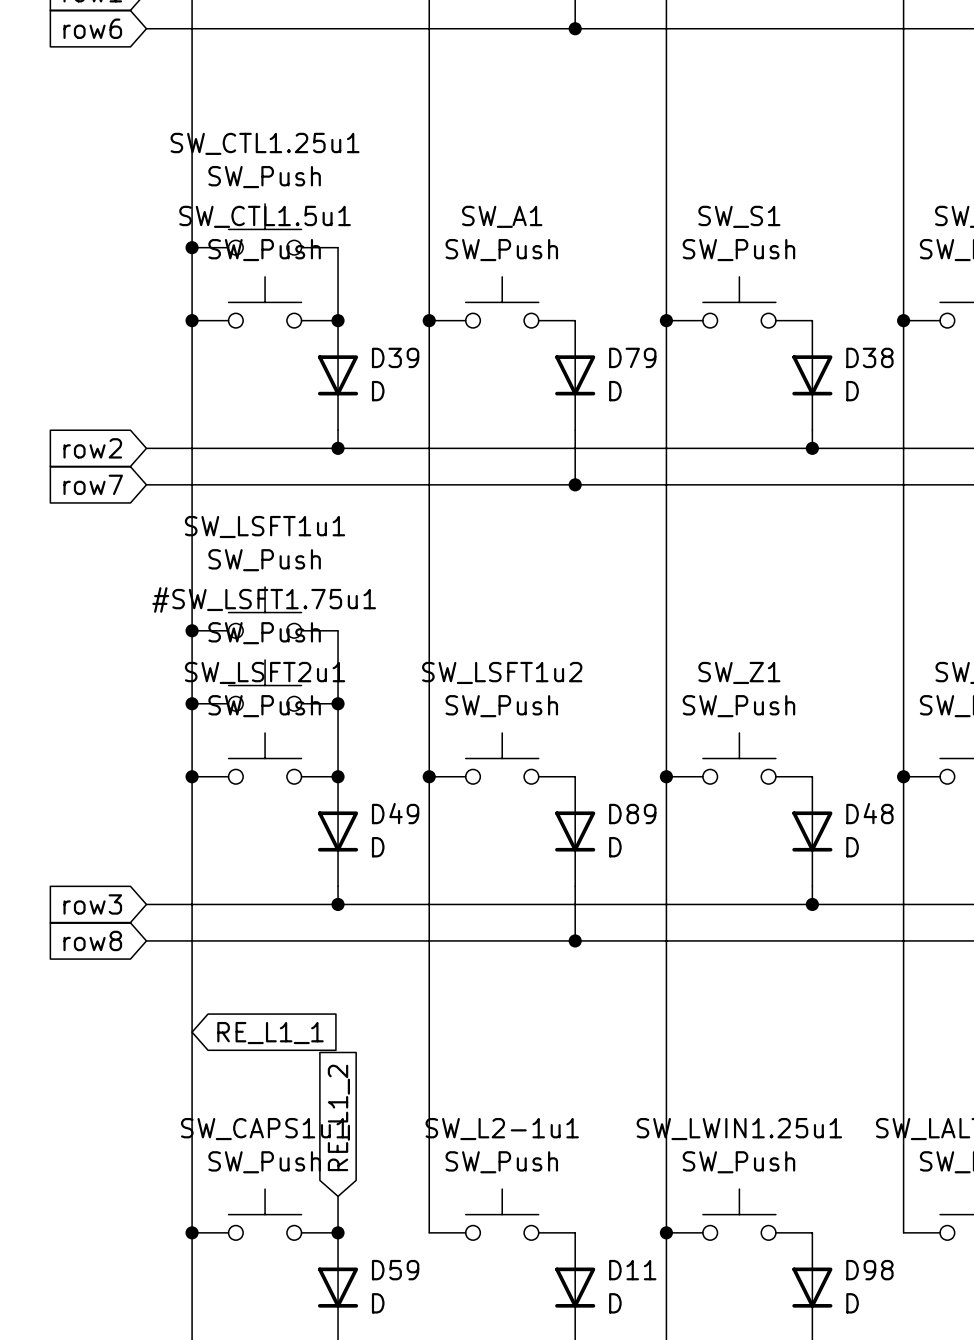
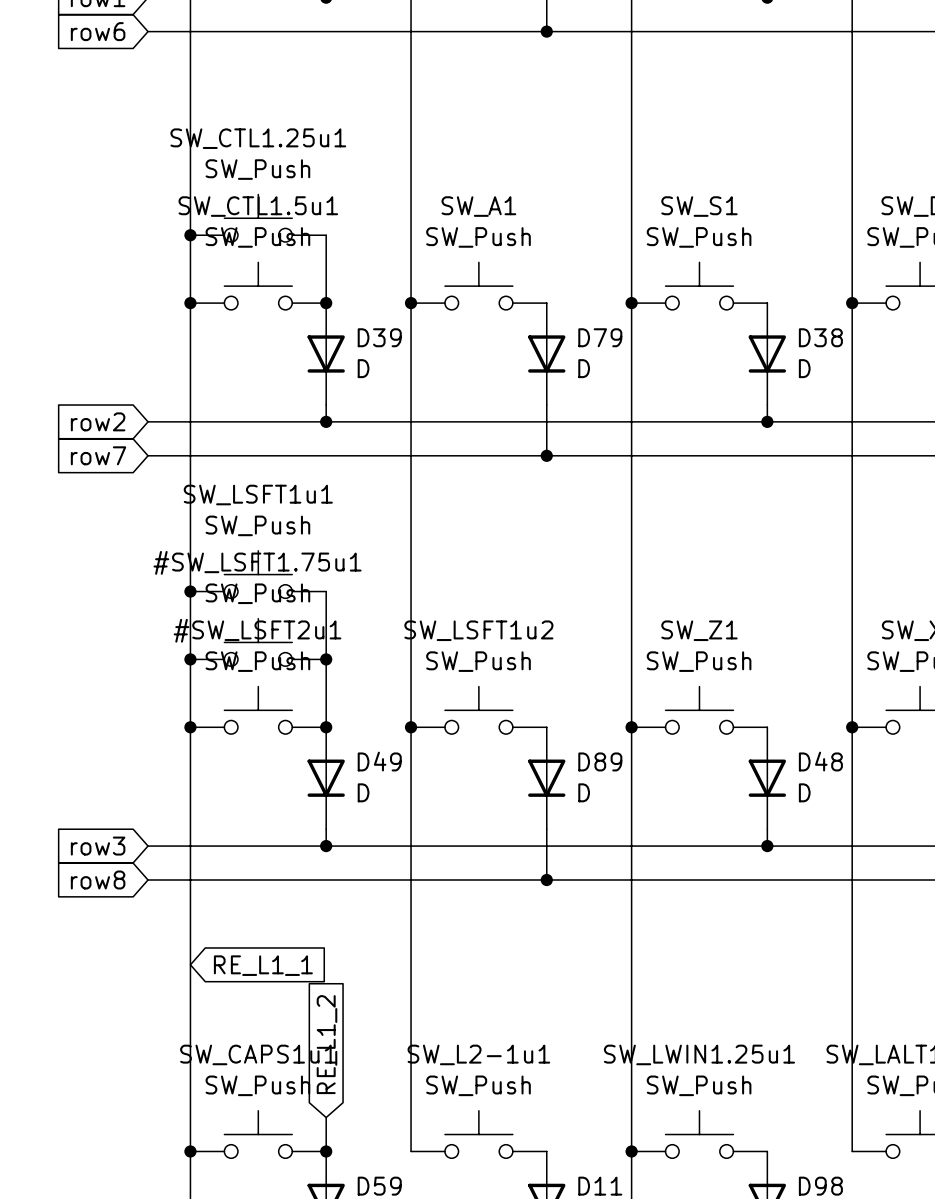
SW_LSFT2u1: SW_Push (265, 758) -> none
#SW_LSFT2u1: none -> SW_Push (258, 710)

